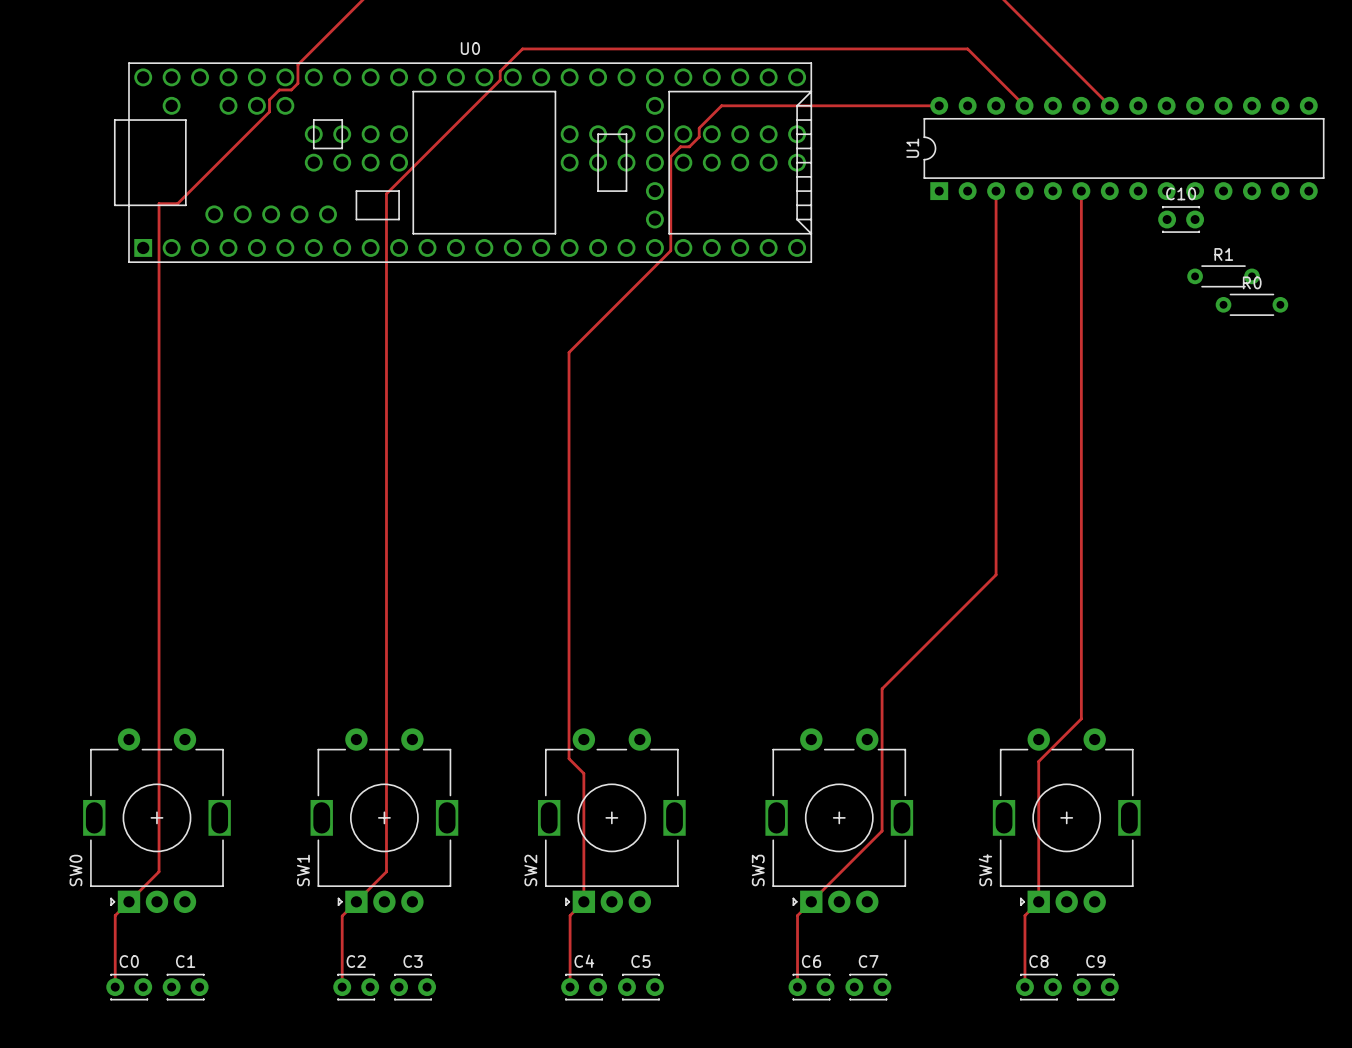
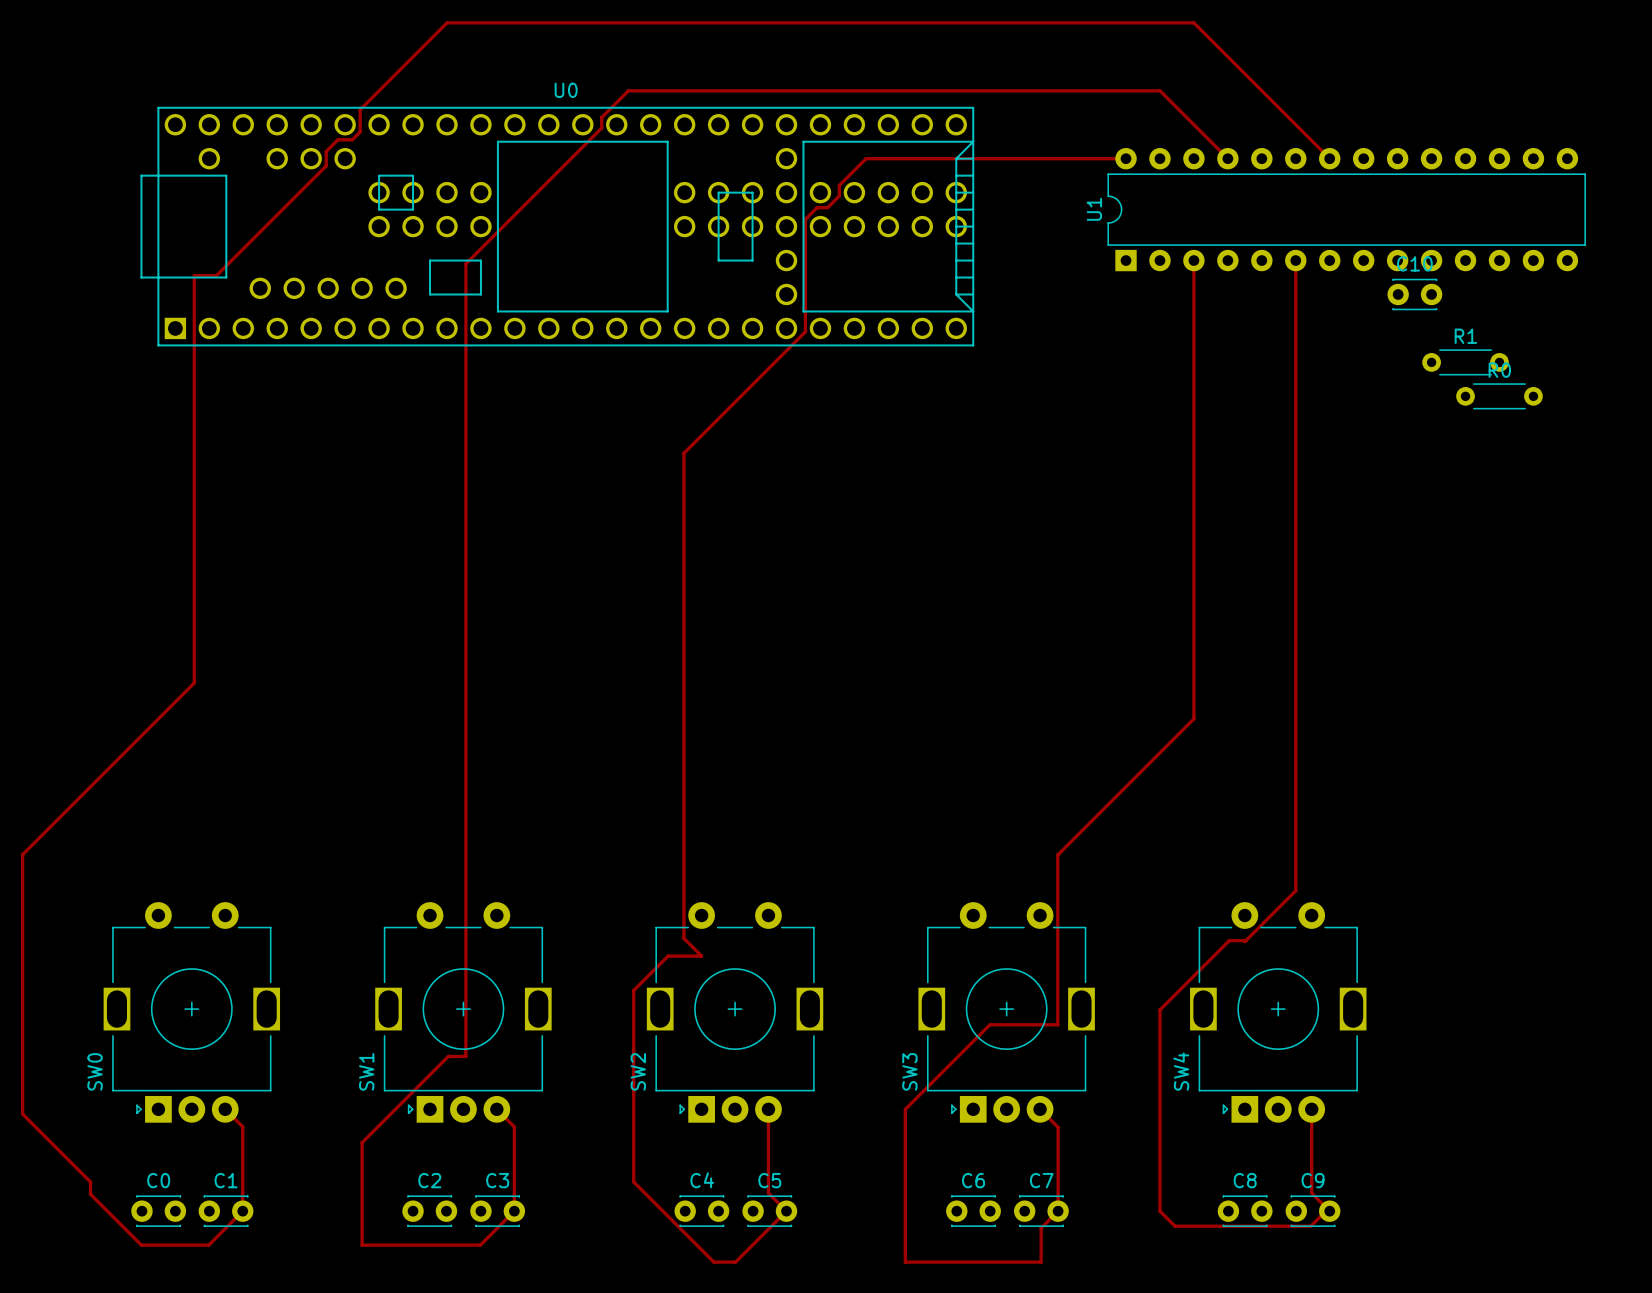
track: (159, 544) (159, 871) (115, 915) (115, 987) -> (194, 682) (22, 854) (22, 1114) (90, 1181) (90, 1194) (141, 1245) (208, 1245) (242, 1211) (242, 1126) (225, 1109)
track: none -> (1245, 940) (1229, 940) (1159, 1009) (1159, 1211) (1175, 1226) (1310, 1226) (1325, 1211) (1329, 1211) (1311, 1193) (1311, 1109)
track: (1038, 761) (1038, 901) (1024, 915) (1024, 987) -> none
track: (583, 773) (583, 901) (570, 915) (570, 987) -> (701, 956) (668, 956) (633, 990) (633, 1181) (713, 1262) (735, 1262) (786, 1211) (768, 1193) (768, 1109)
track: (882, 831) (797, 915) (797, 987) -> (1057, 1024) (989, 1024) (905, 1109) (905, 1262) (1041, 1262) (1041, 1228) (1058, 1211) (1058, 1127) (1040, 1109)
track: (386, 857) (386, 871) (342, 916) (342, 987) -> (465, 1056) (448, 1056) (362, 1142) (362, 1245) (480, 1245) (514, 1211) (514, 1126) (496, 1109)

